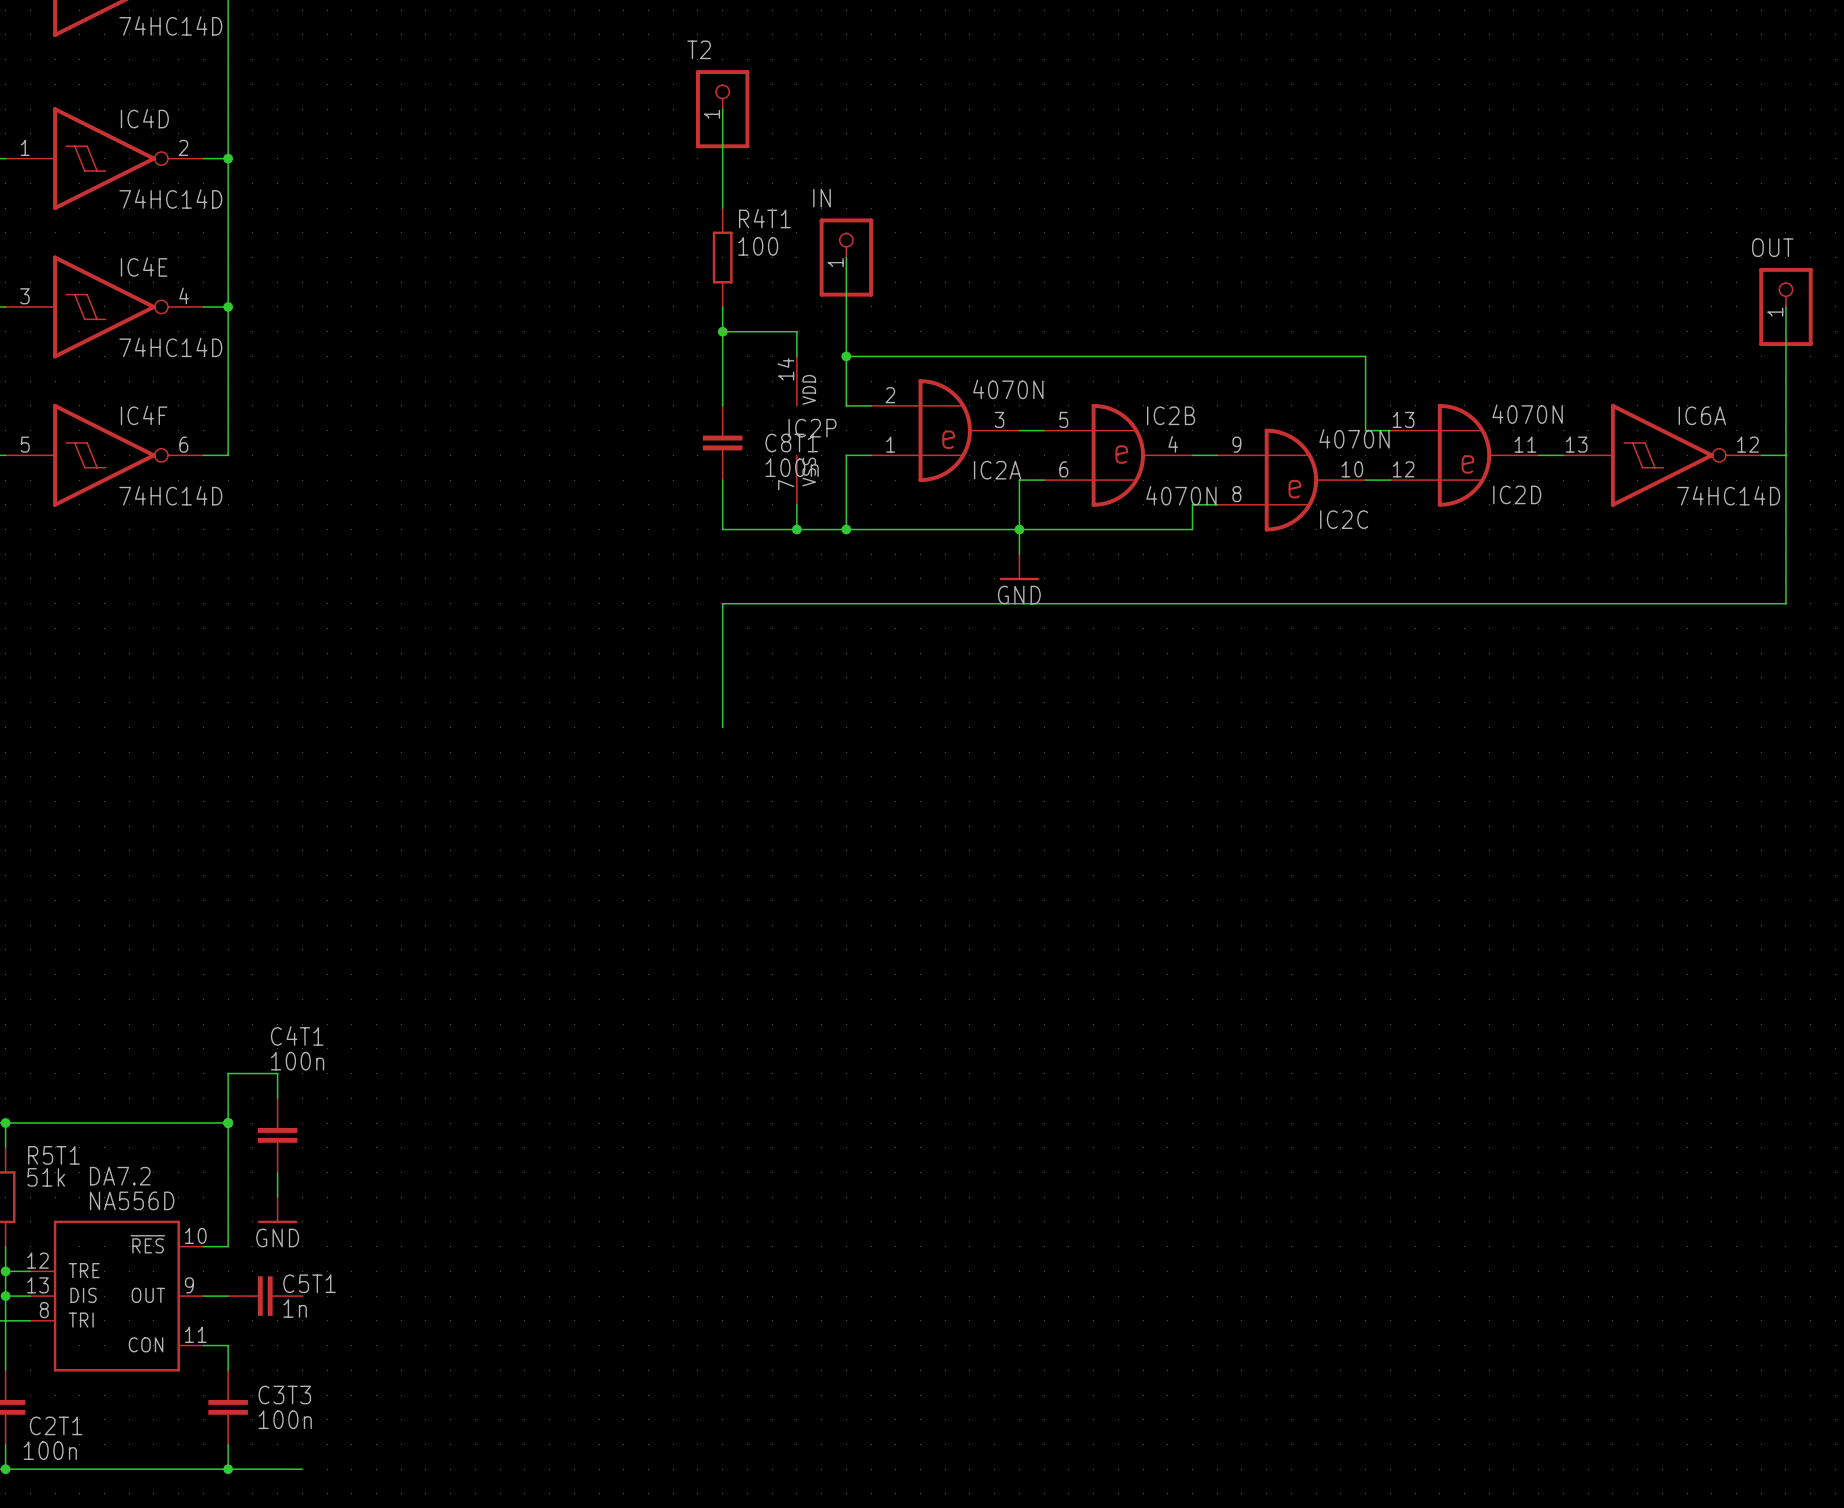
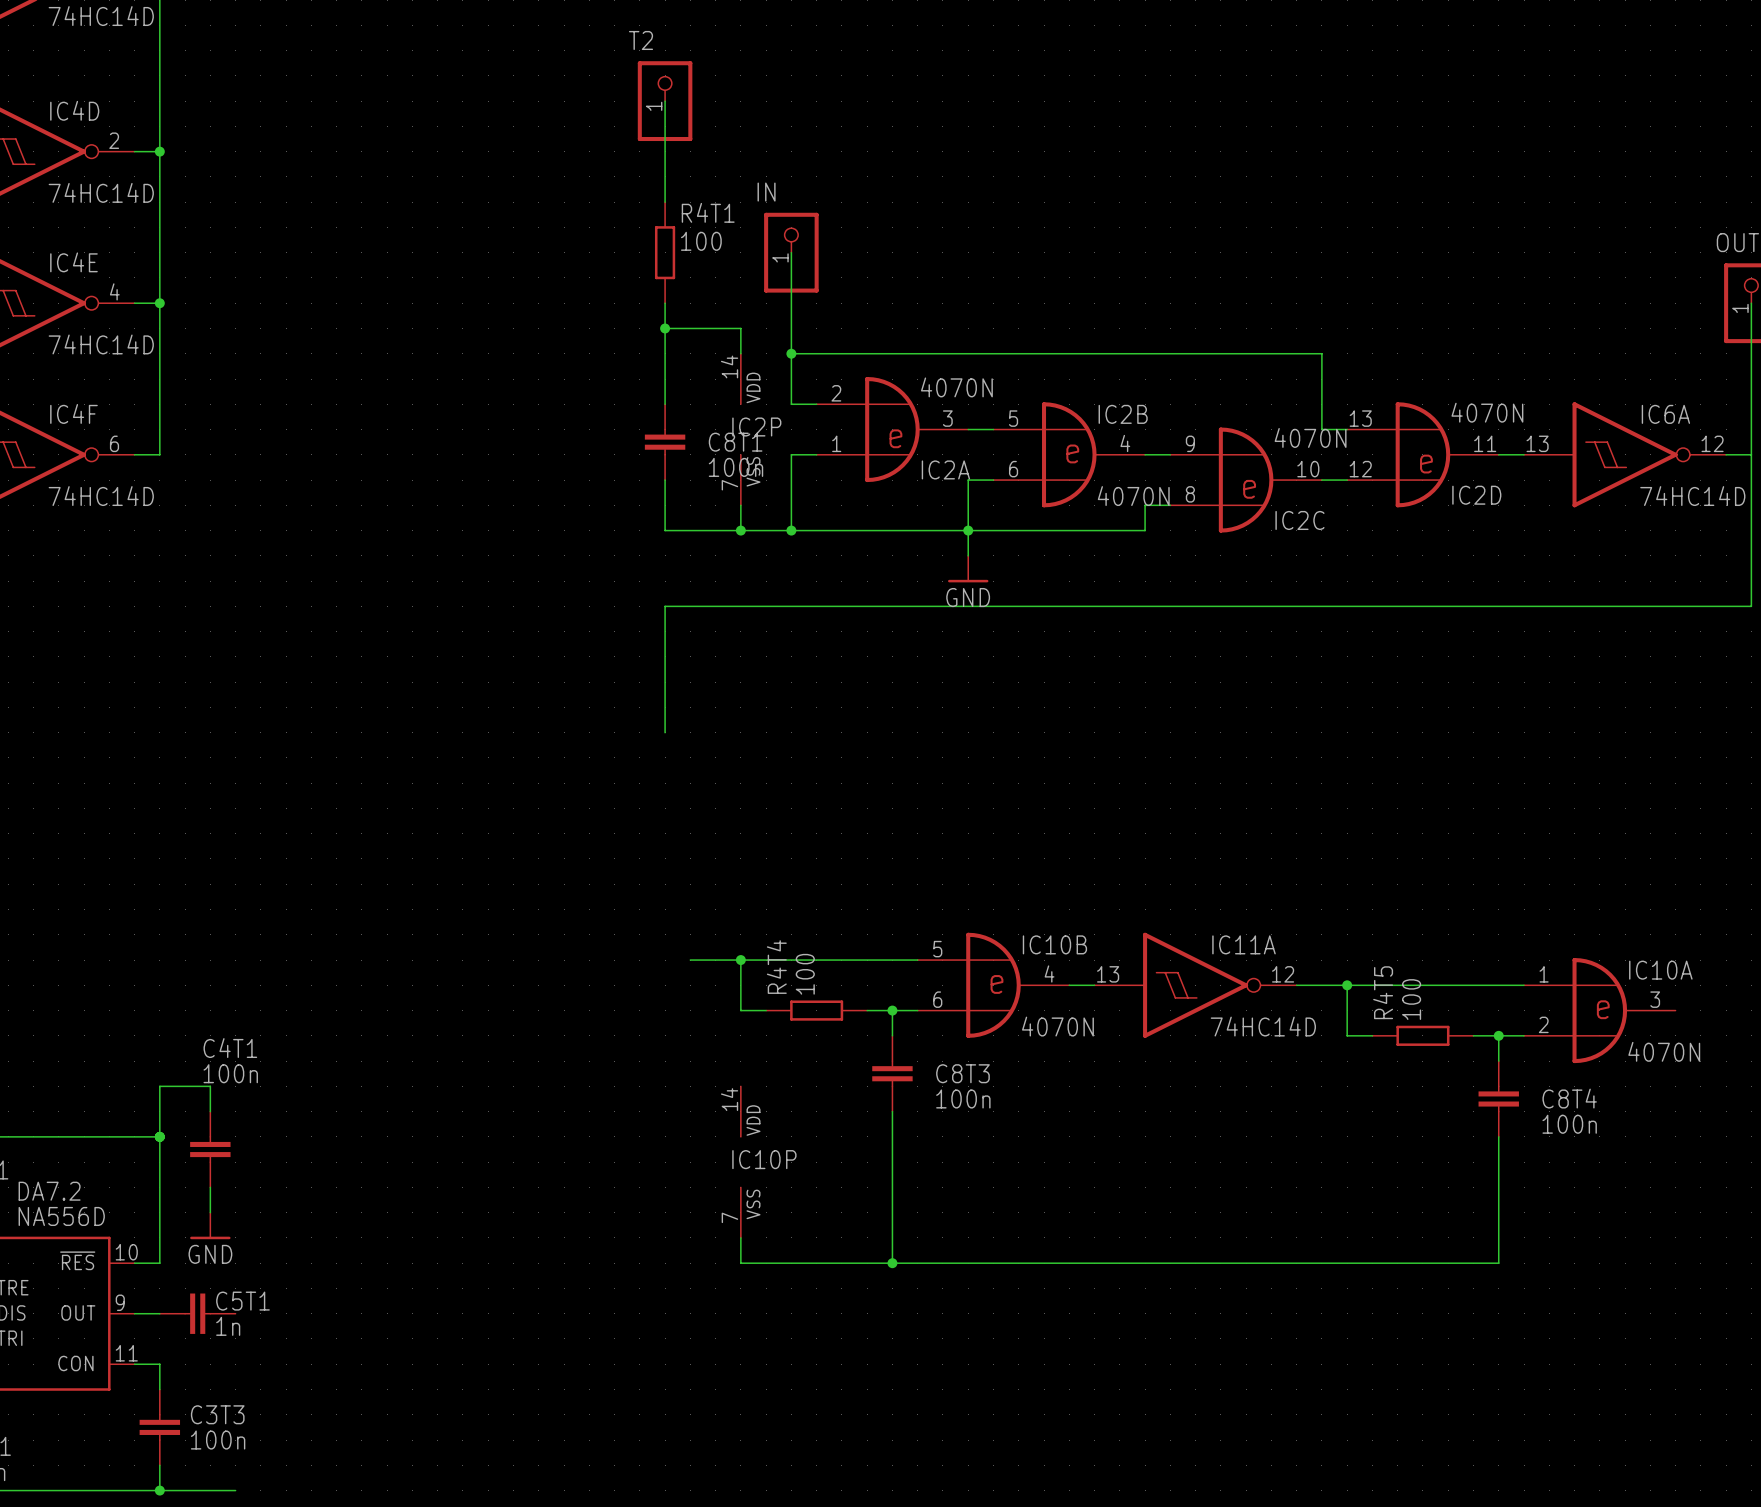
wire: none -> (690, 960) (917, 960)
wire: none -> (740, 960) (740, 1010) (766, 1010)
junction: none -> (740, 960)
IC10B: none -> 4070N (993, 985)
wire: none -> (1069, 985) (1094, 985)
IC11A: none -> 74HC14D (1195, 985)
wire: none -> (1296, 985) (1524, 985)
wire: none -> (1347, 985) (1347, 1035) (1372, 1035)
junction: none -> (1347, 985)
R4T4: none -> 100 (816, 1010)
wire: none -> (867, 1010) (917, 1010)
wire: none -> (892, 1010) (892, 1035)
junction: none -> (892, 1010)
IC10A: none -> 4070N (1599, 1010)
R4T5: none -> 100 (1422, 1035)
wire: none -> (1473, 1035) (1524, 1035)
wire: none -> (1498, 1035) (1498, 1061)
junction: none -> (1498, 1035)
C8T3: none -> 100n (892, 1073)
C8T4: none -> 100n (1498, 1098)
wire: none -> (892, 1111) (892, 1263)
wire: none -> (1498, 1136) (1498, 1263) (740, 1263) (740, 1237)
IC10P: none -> (740, 1162)
junction: none -> (892, 1263)

